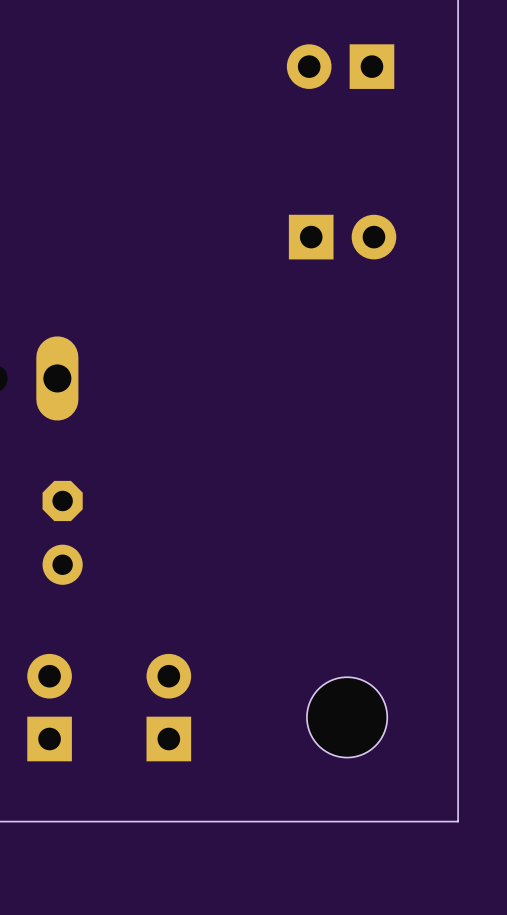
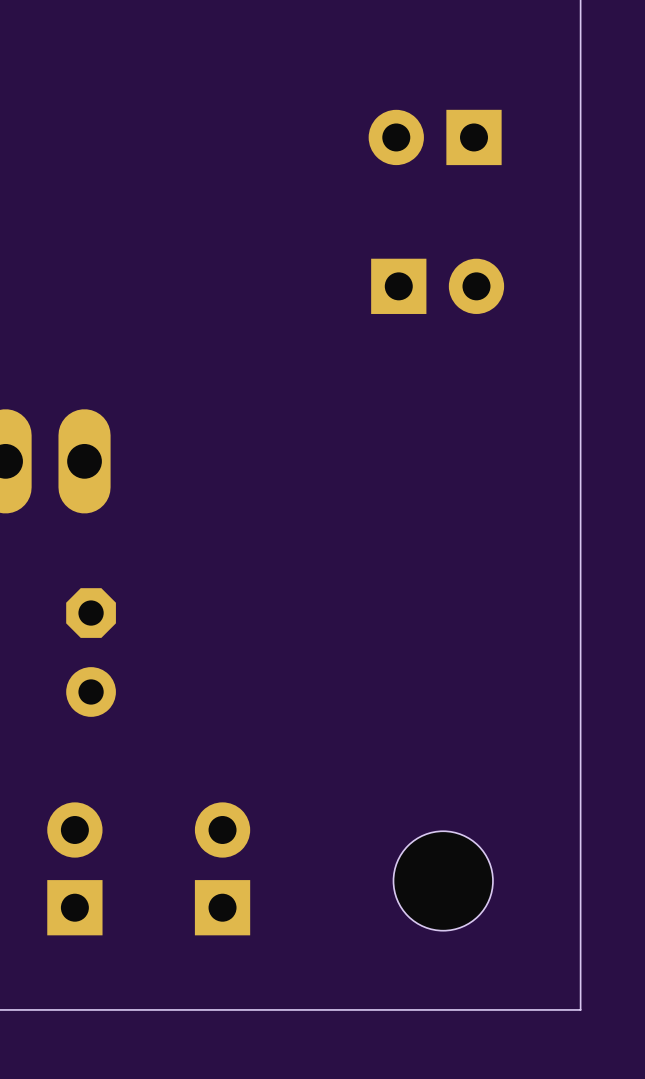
part position: (340, 66) -> (435, 137)

